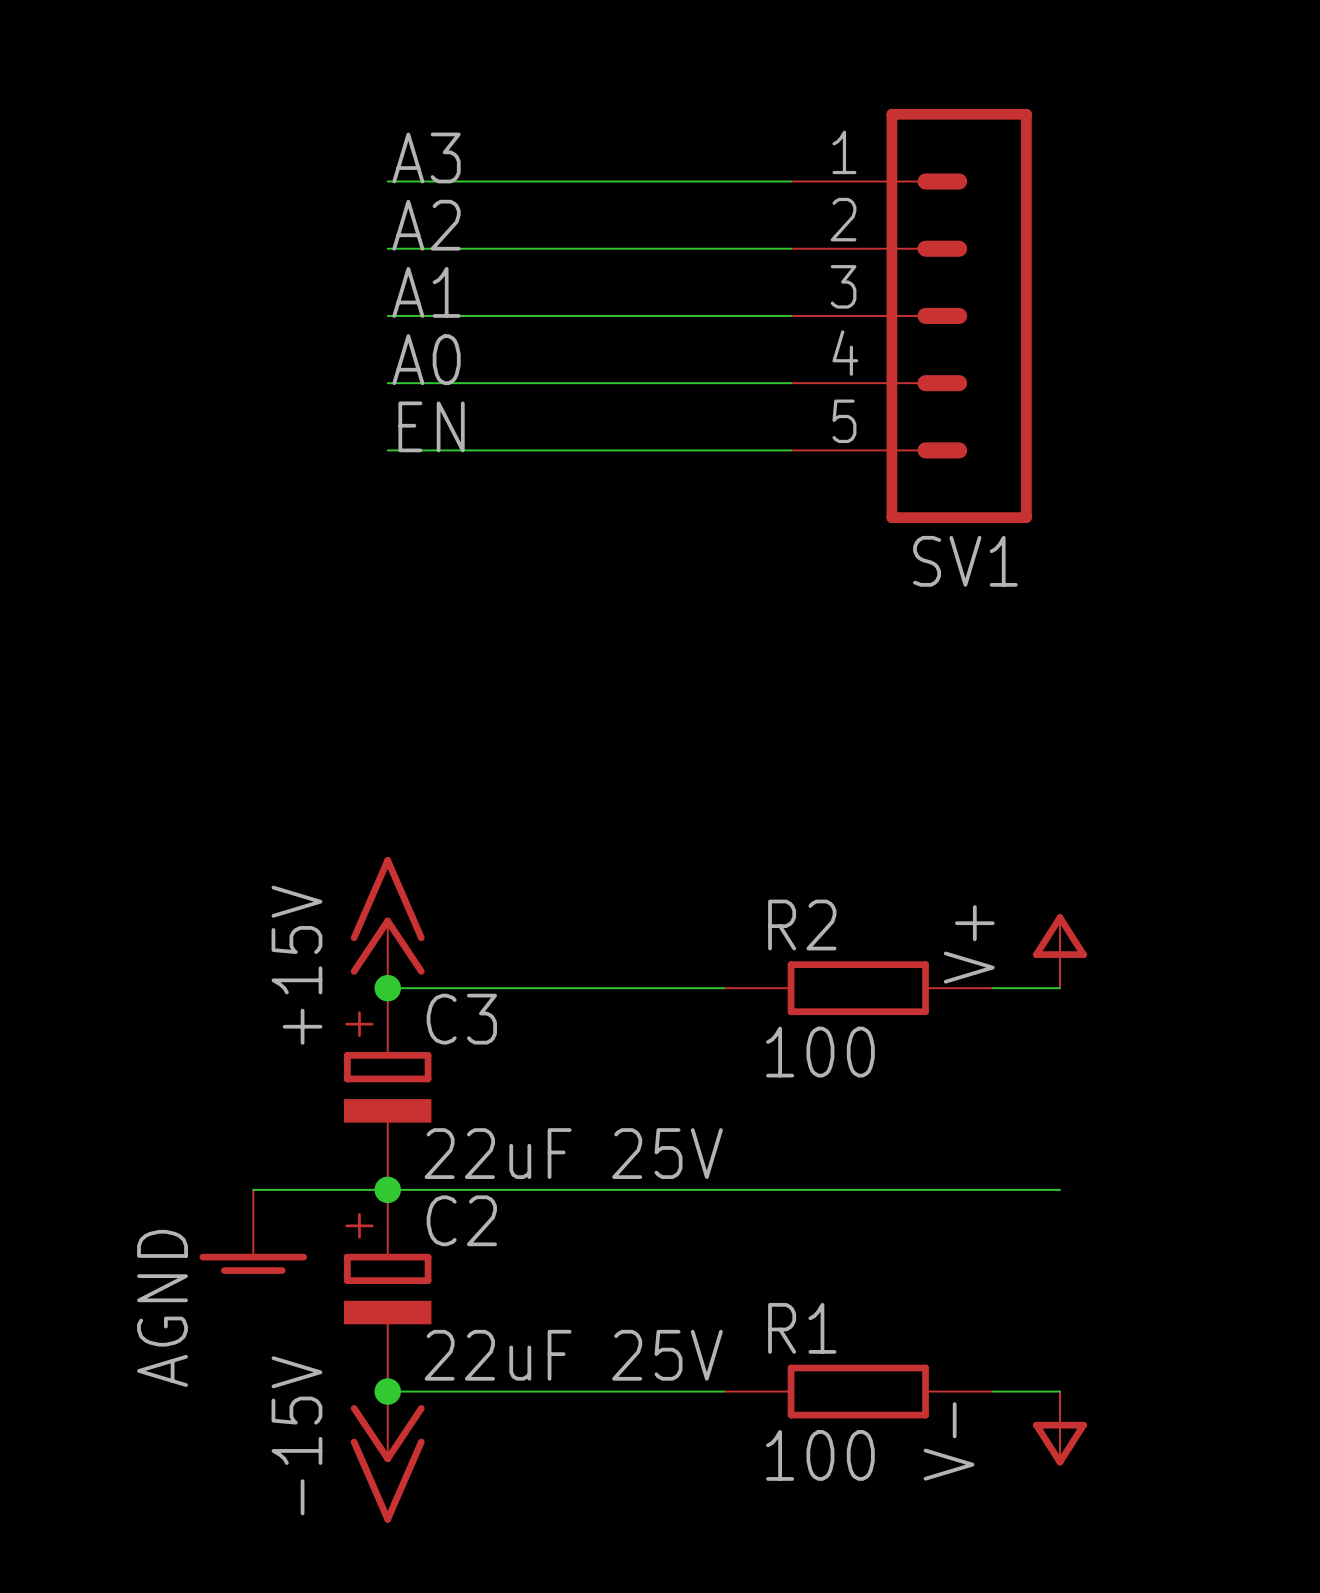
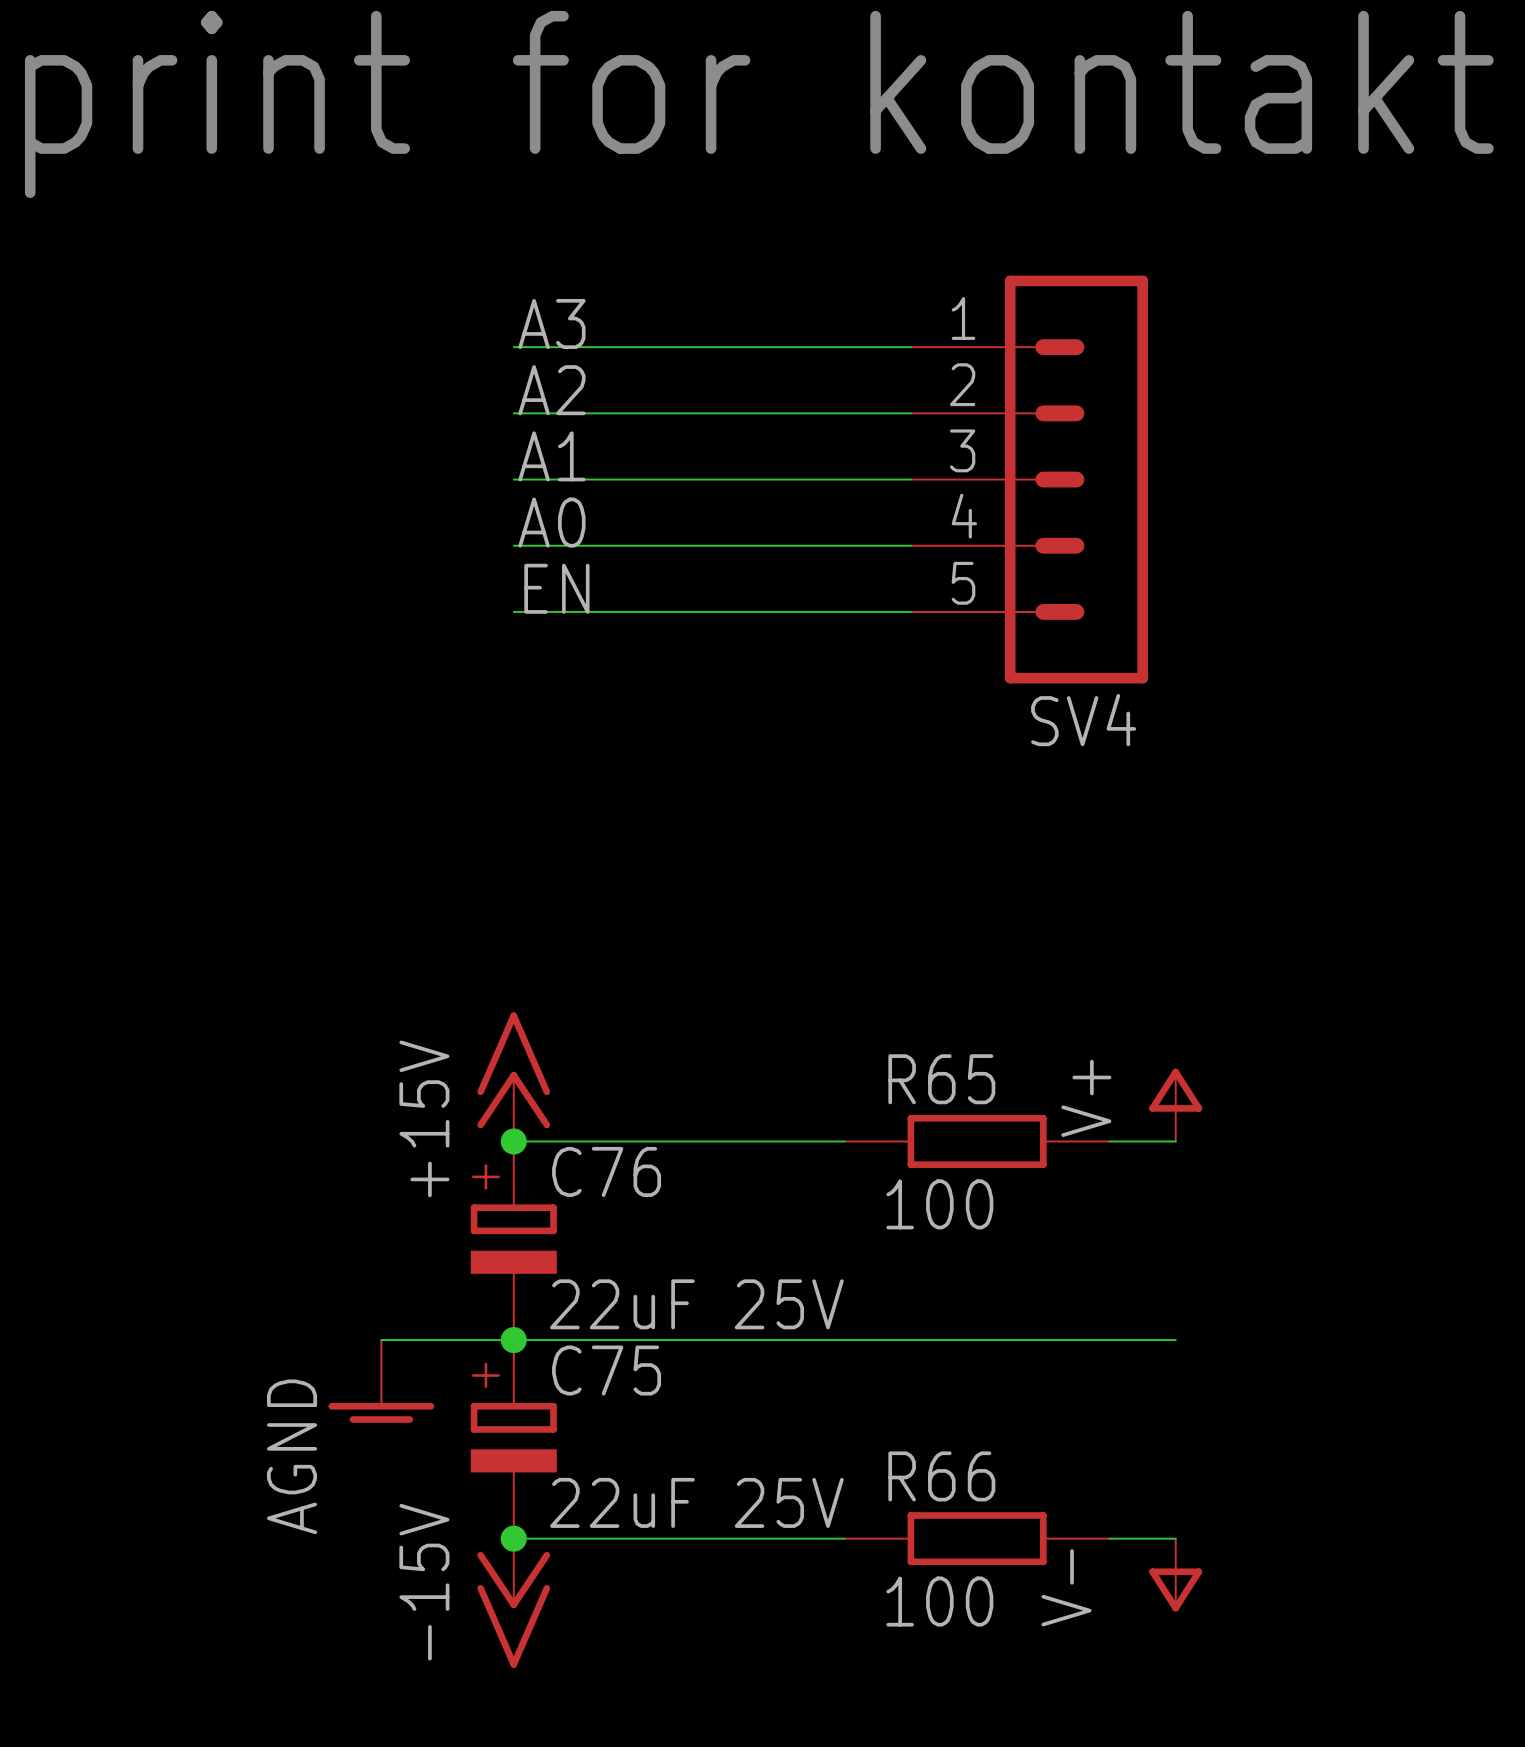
SV1 name: SV1 (965, 561) -> SV4 (1083, 720)
R2 name: R2 (802, 925) -> R65 (941, 1079)
C3 name: C3 (461, 1019) -> C76 (606, 1171)
C2 name: C2 (461, 1220) -> C75 (606, 1370)
R1 name: R1 (802, 1328) -> R66 (941, 1476)

